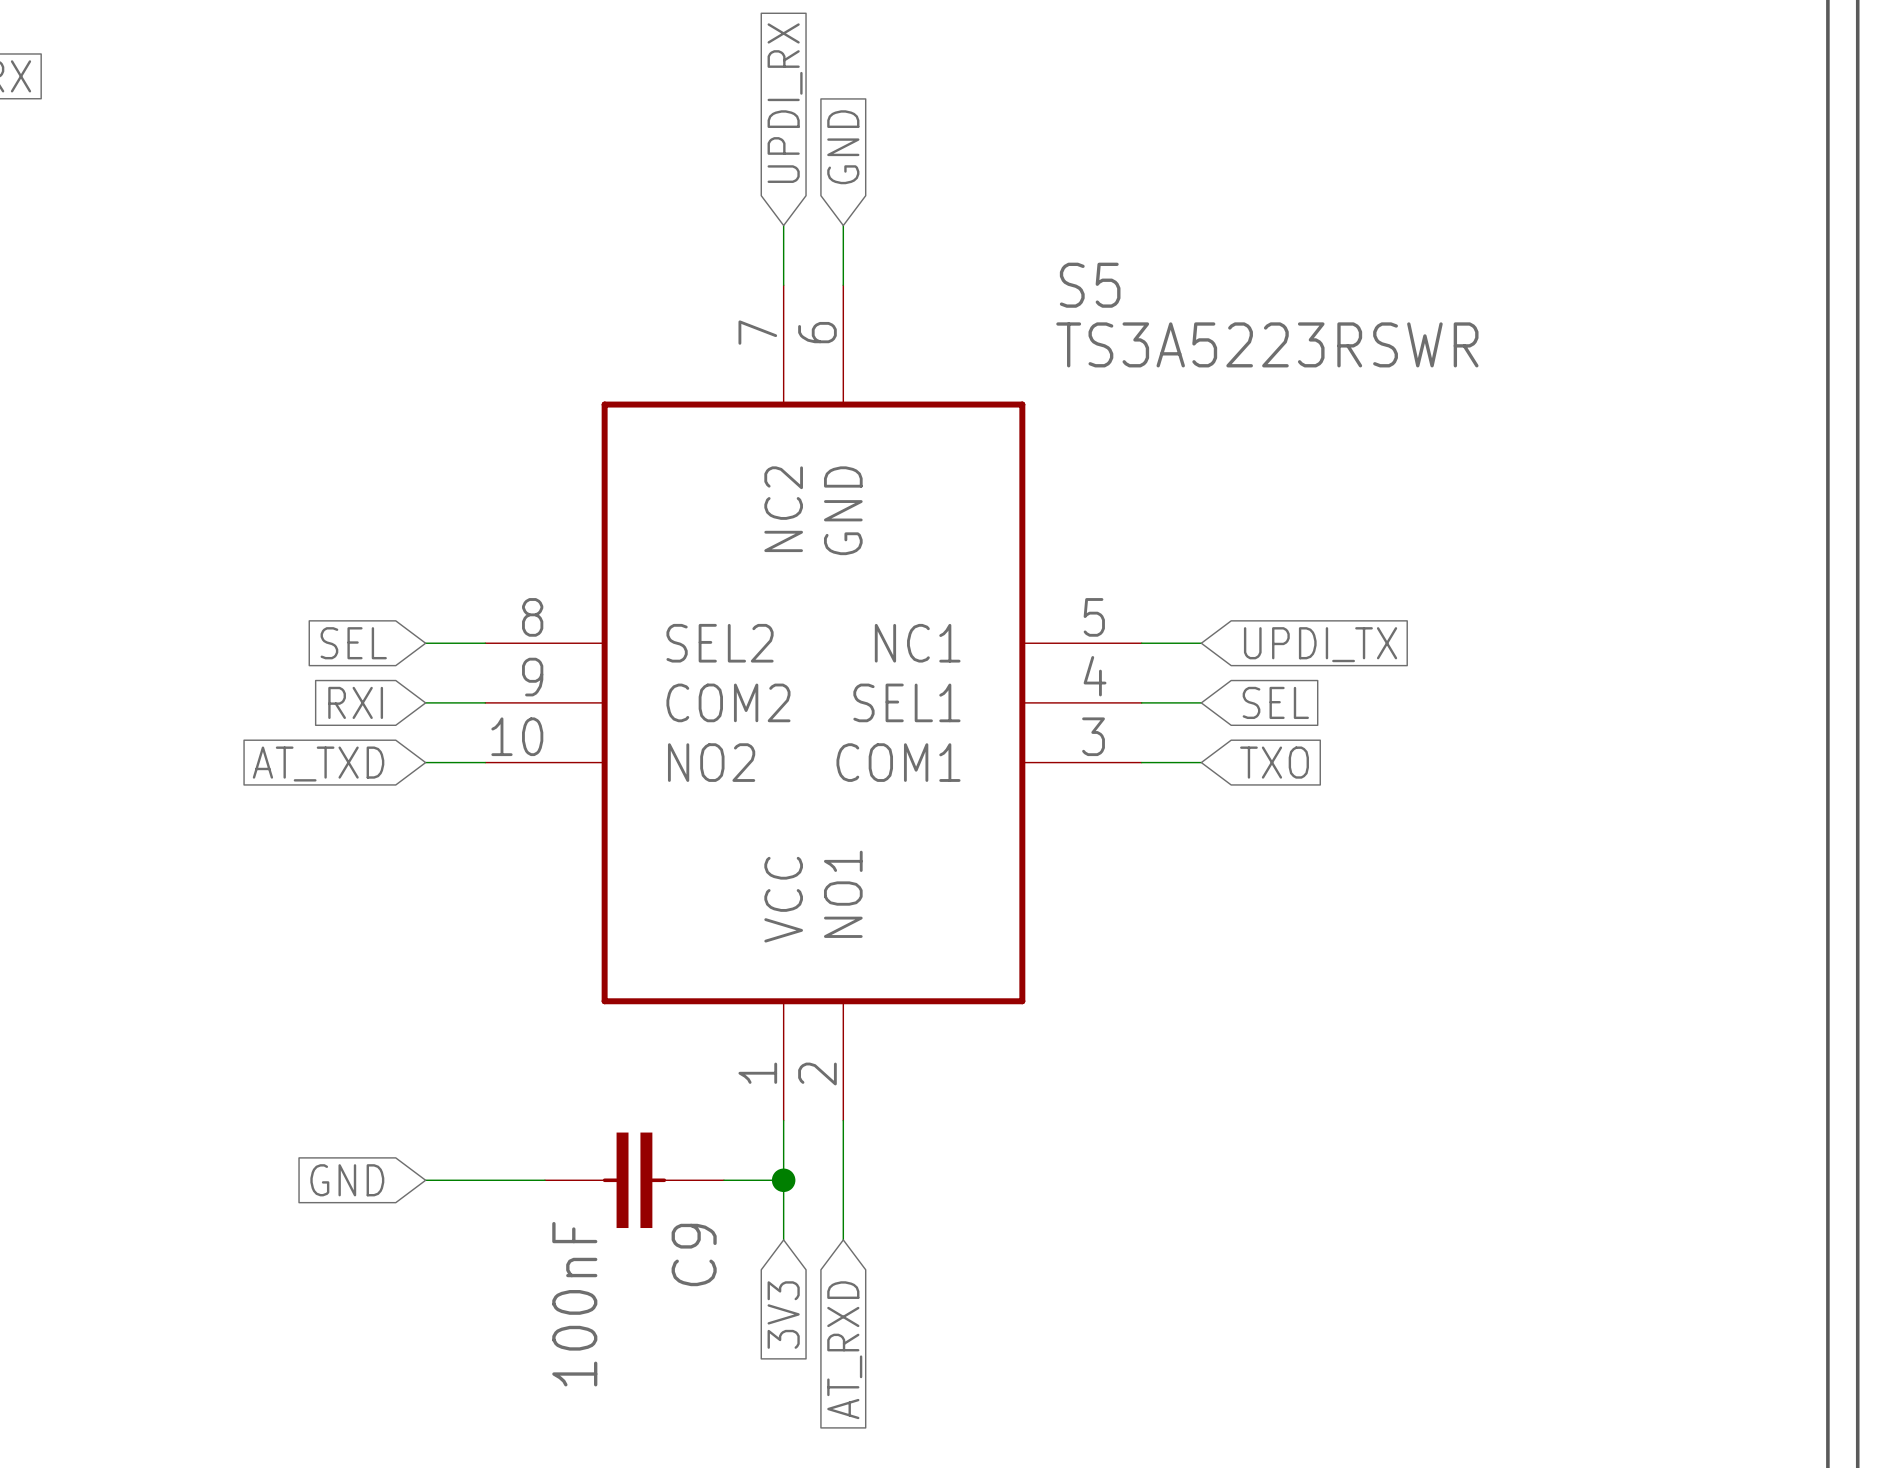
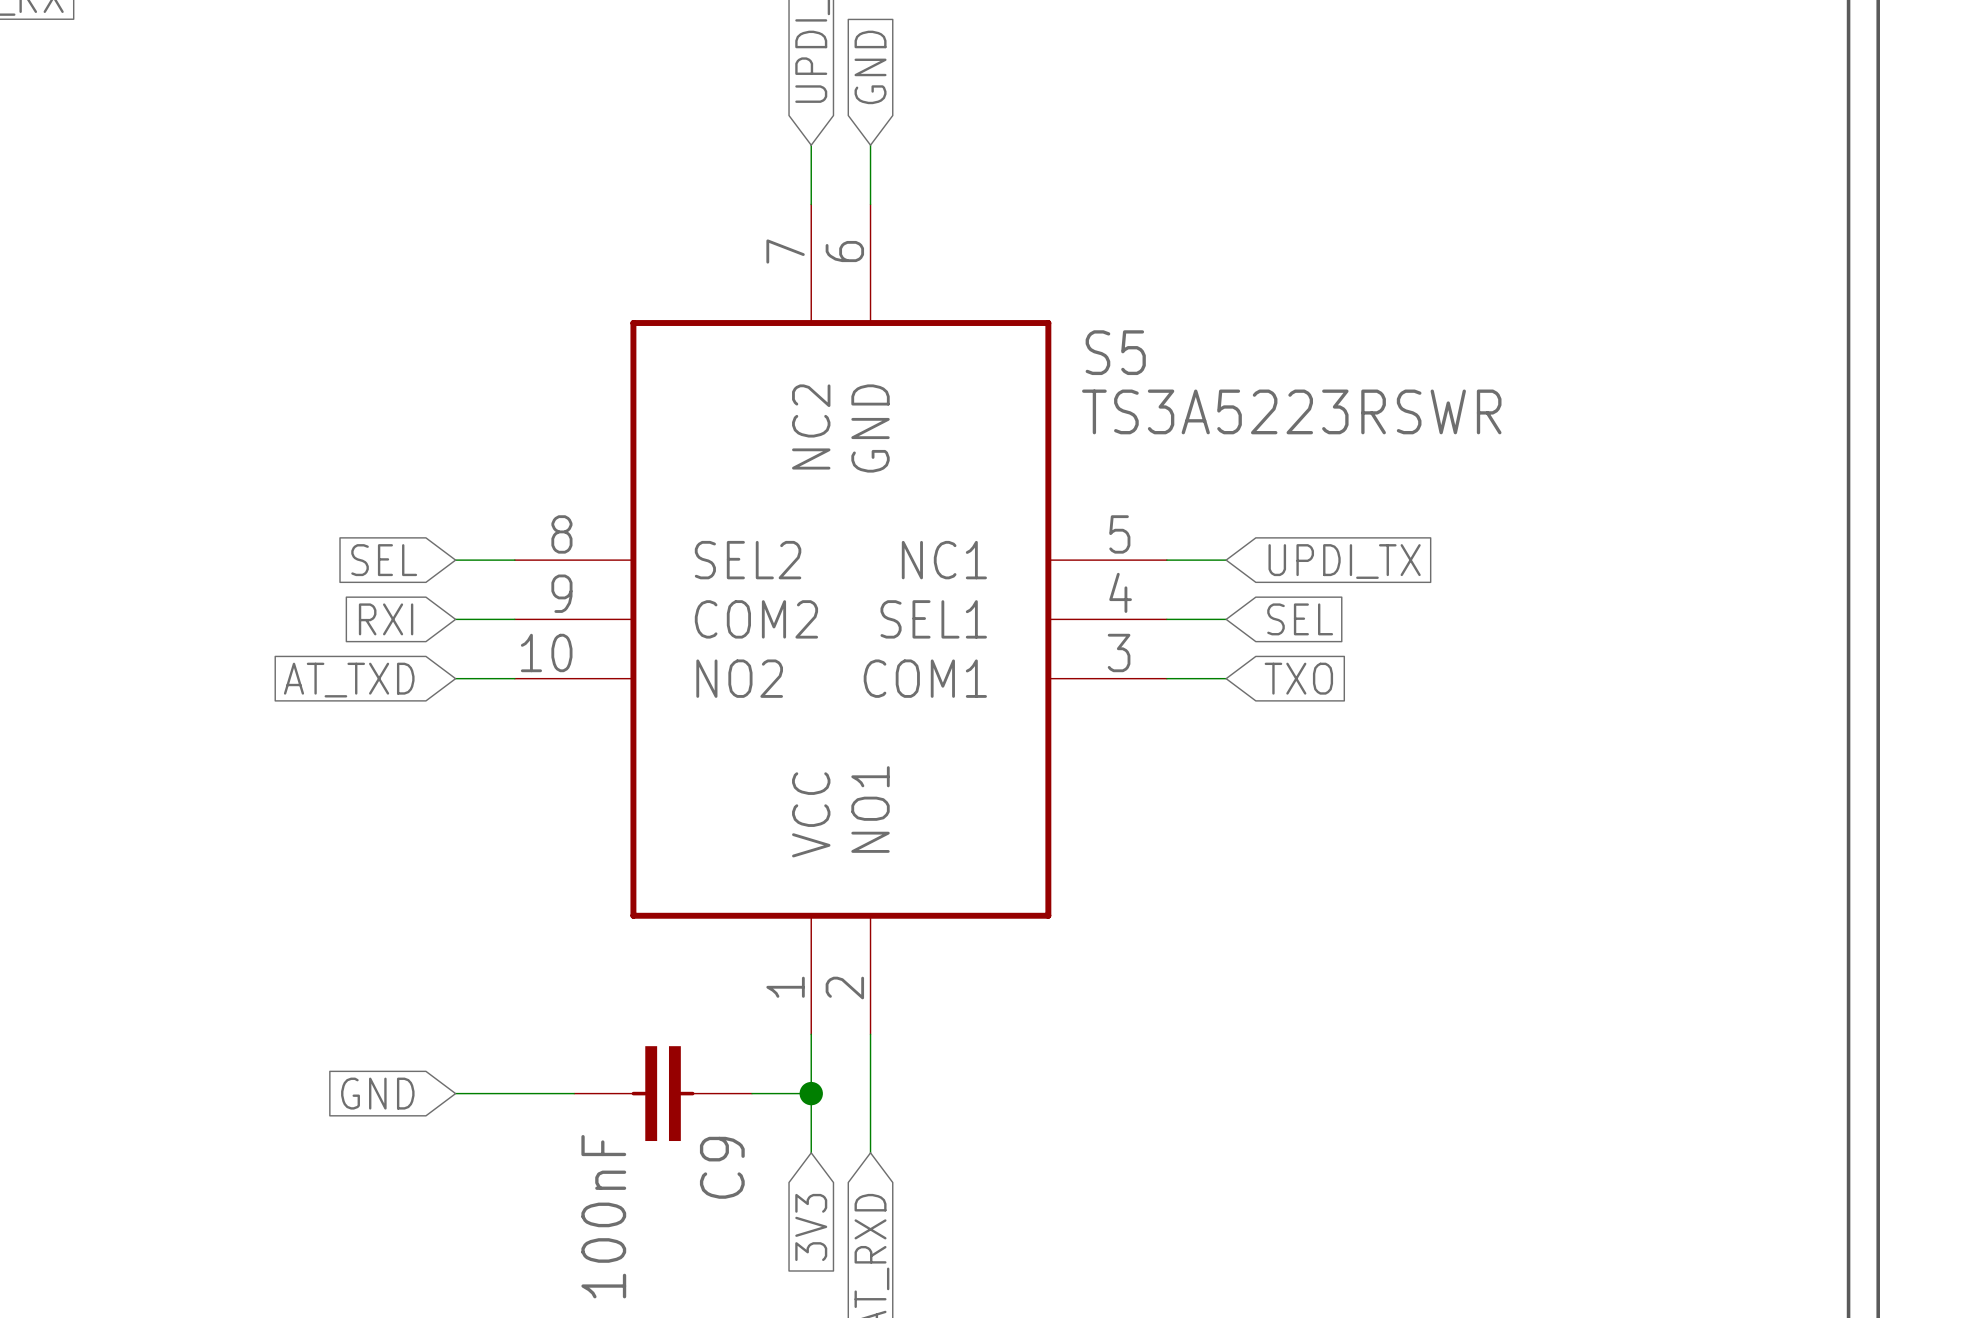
S5 name position: S5 (1090, 285) -> S5 (1115, 352)
S5 value position: TS3A5223RSWR (1267, 344) -> TS3A5223RSWR (1291, 411)

